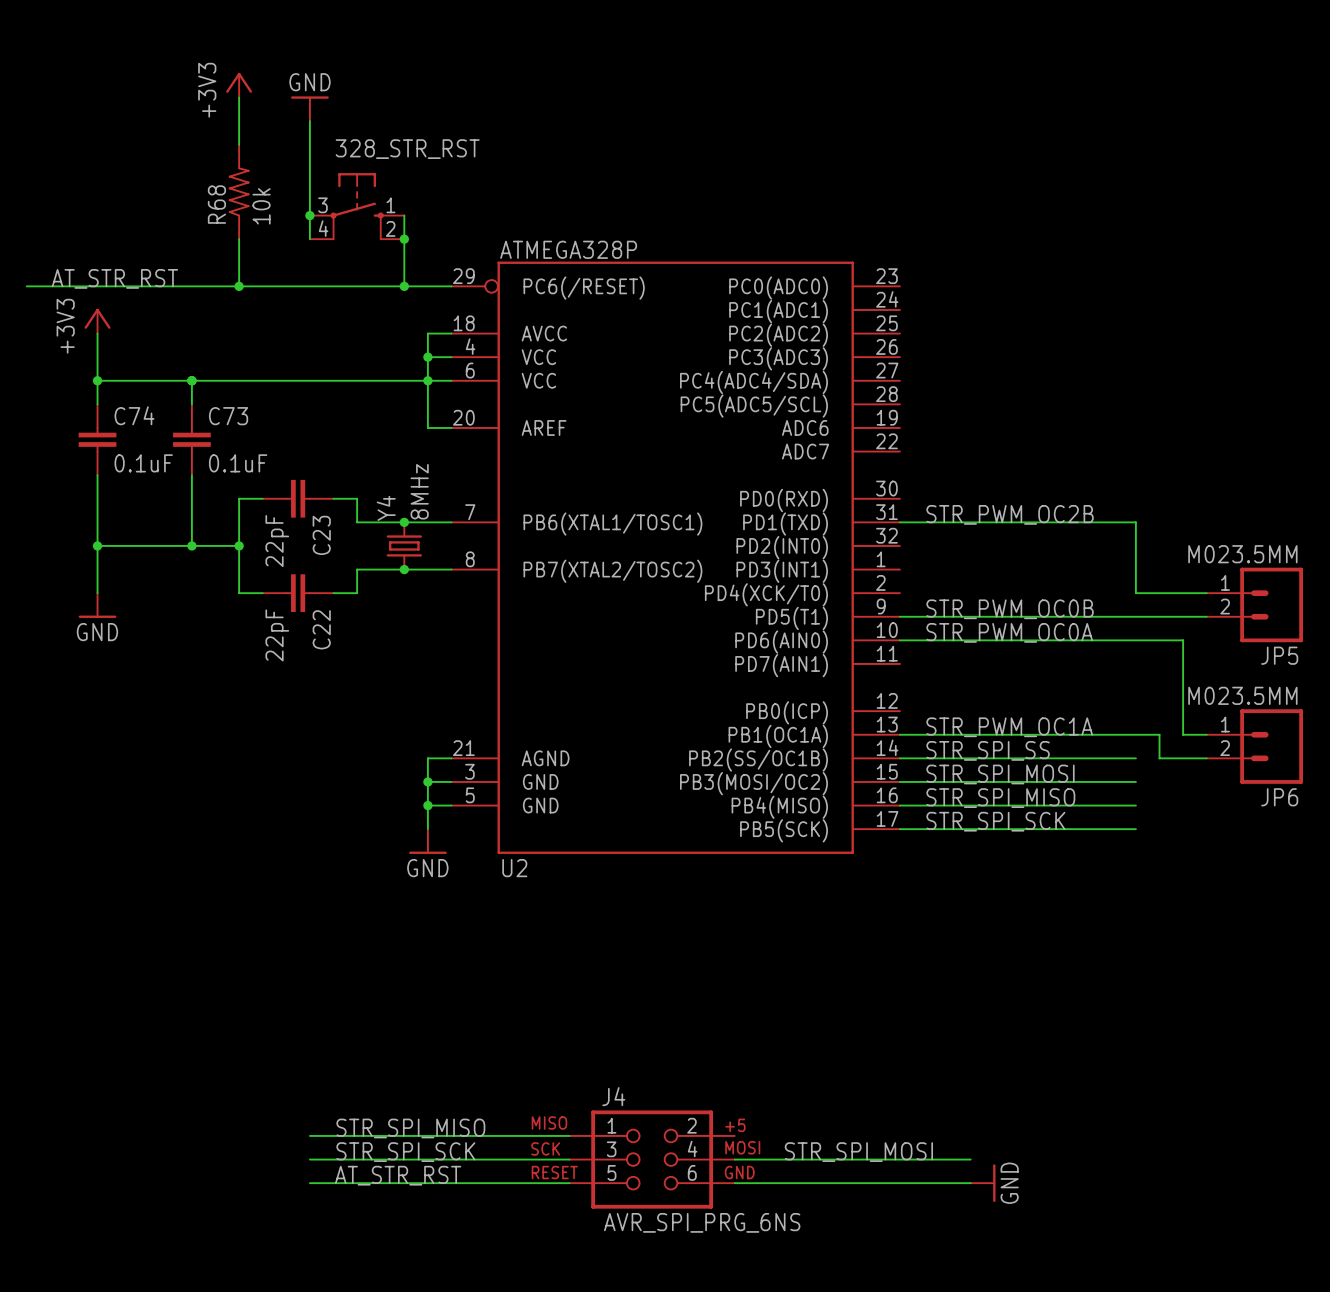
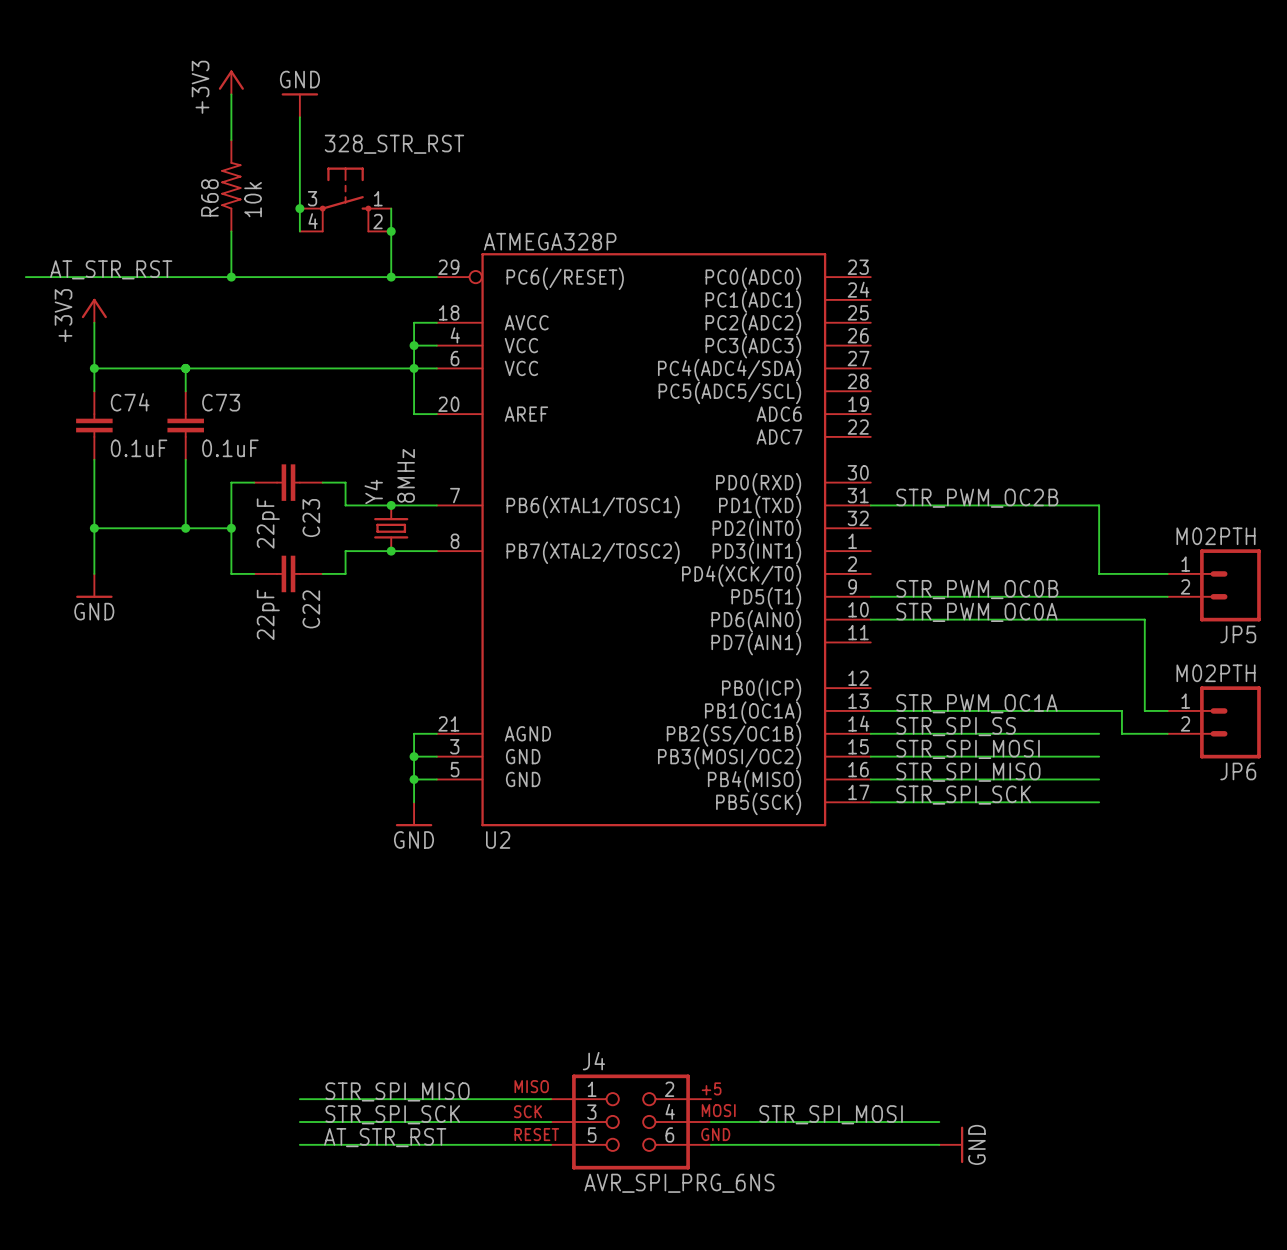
JP5 value: M023.5MM (1242, 554) -> M02PTH (1216, 536)
JP6 value: M023.5MM (1242, 695) -> M02PTH (1216, 673)

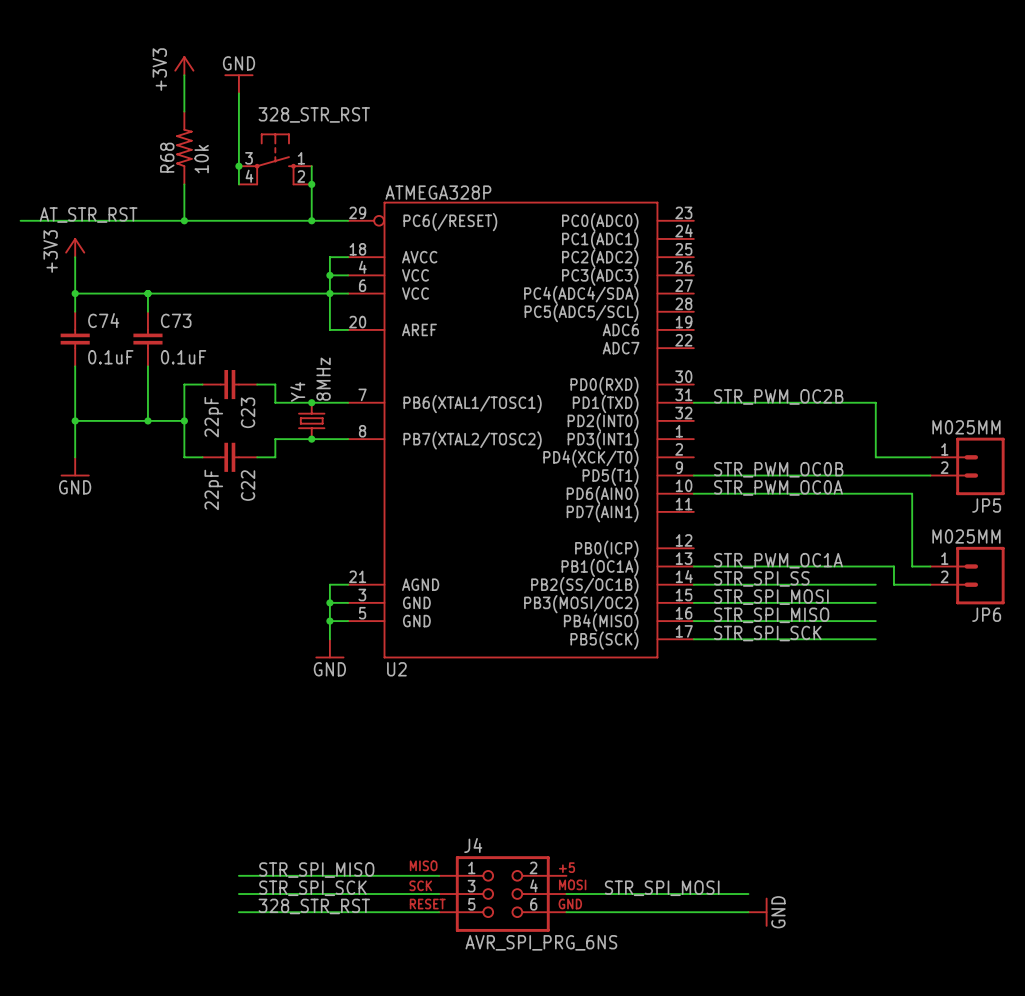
JP5 value: M02PTH (1216, 536) -> M025MM (966, 427)
JP6 value: M02PTH (1216, 673) -> M025MM (966, 536)
label: AT_STR_RST (385, 1137) -> 328_STR_RST (314, 906)

